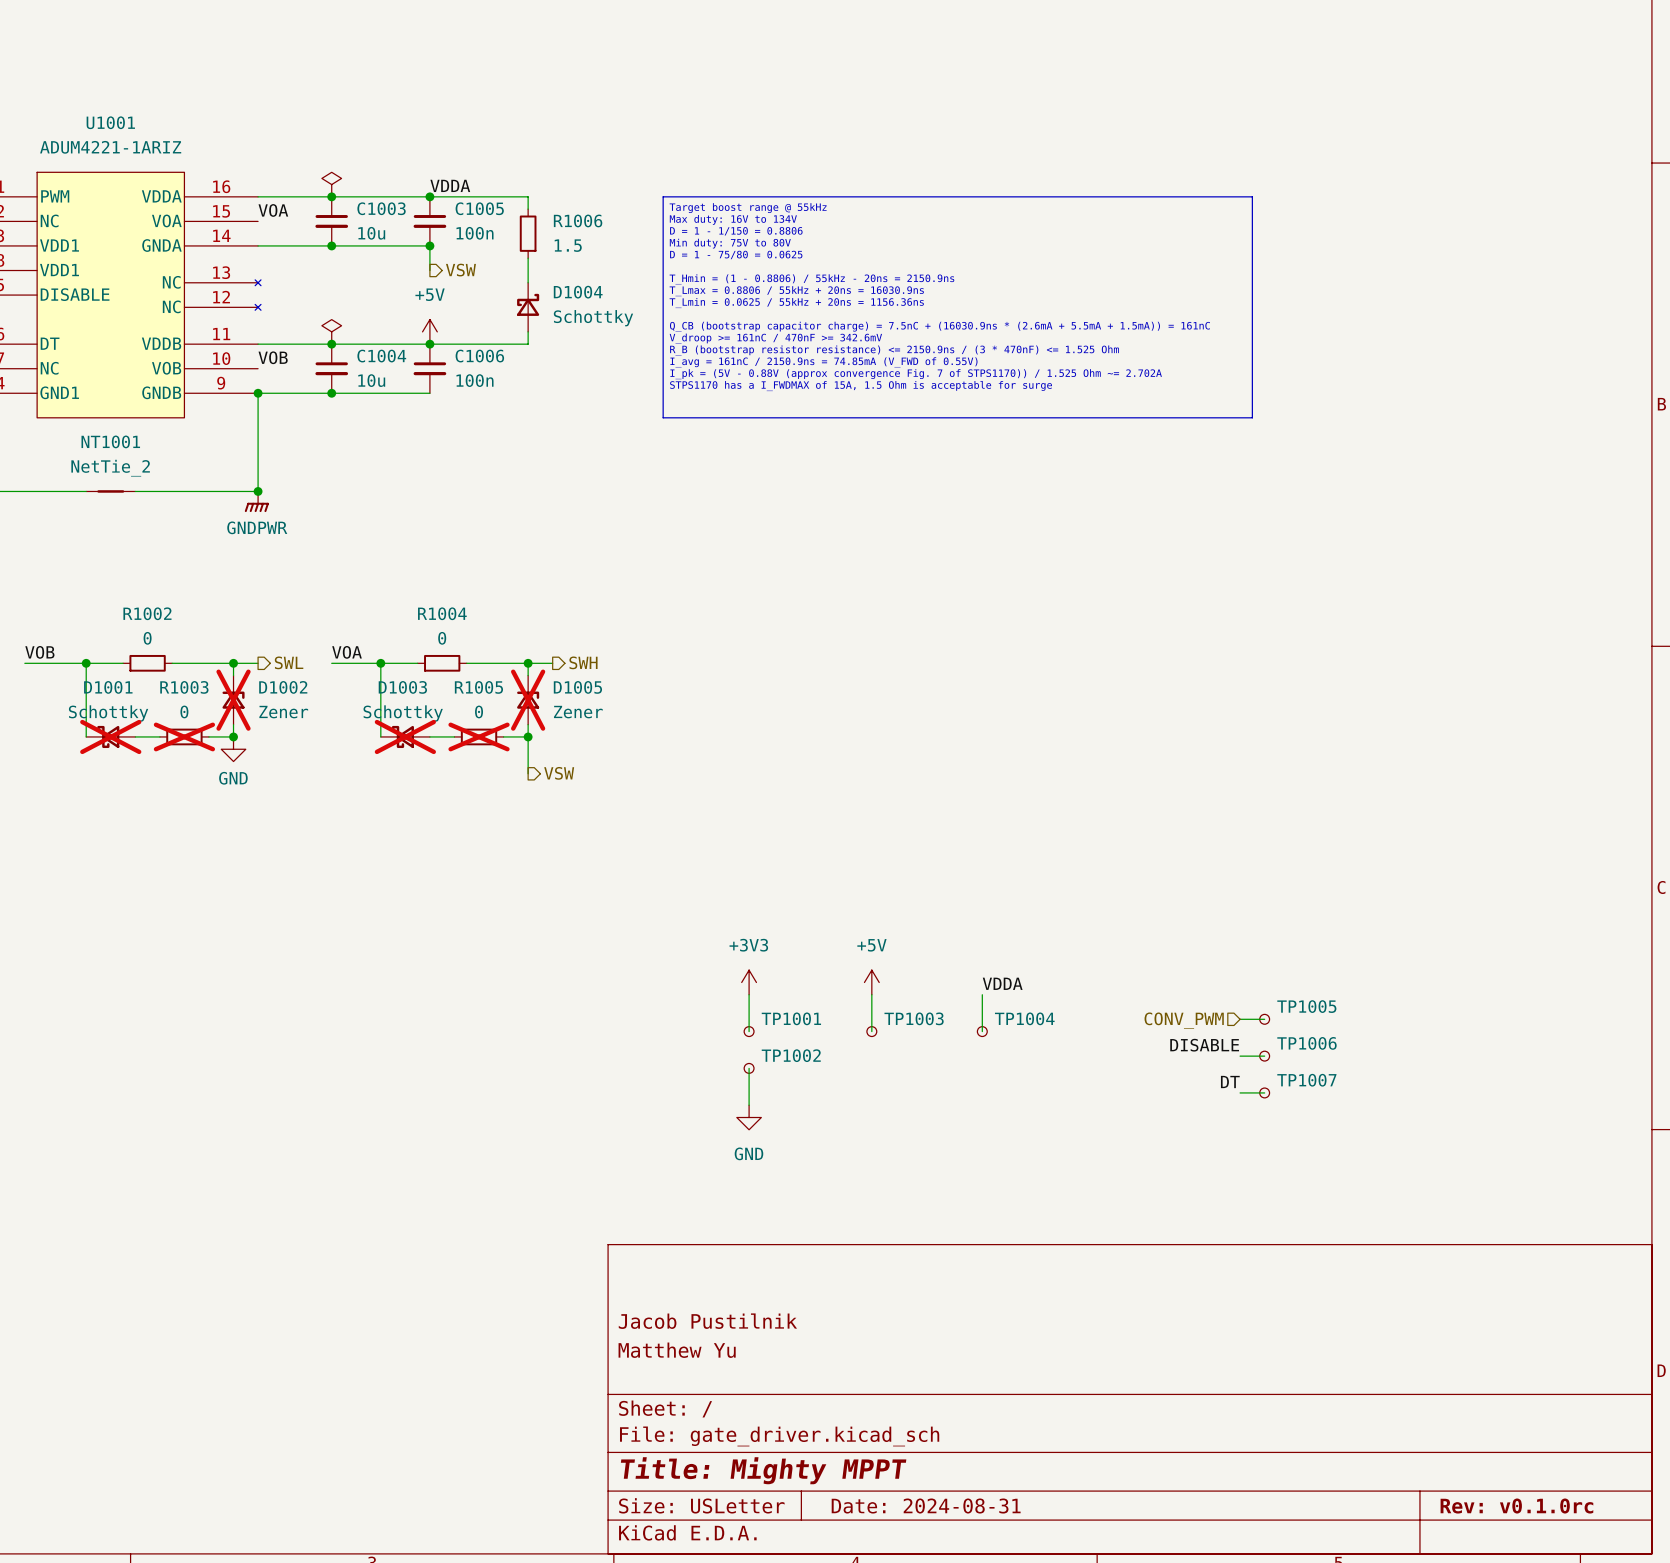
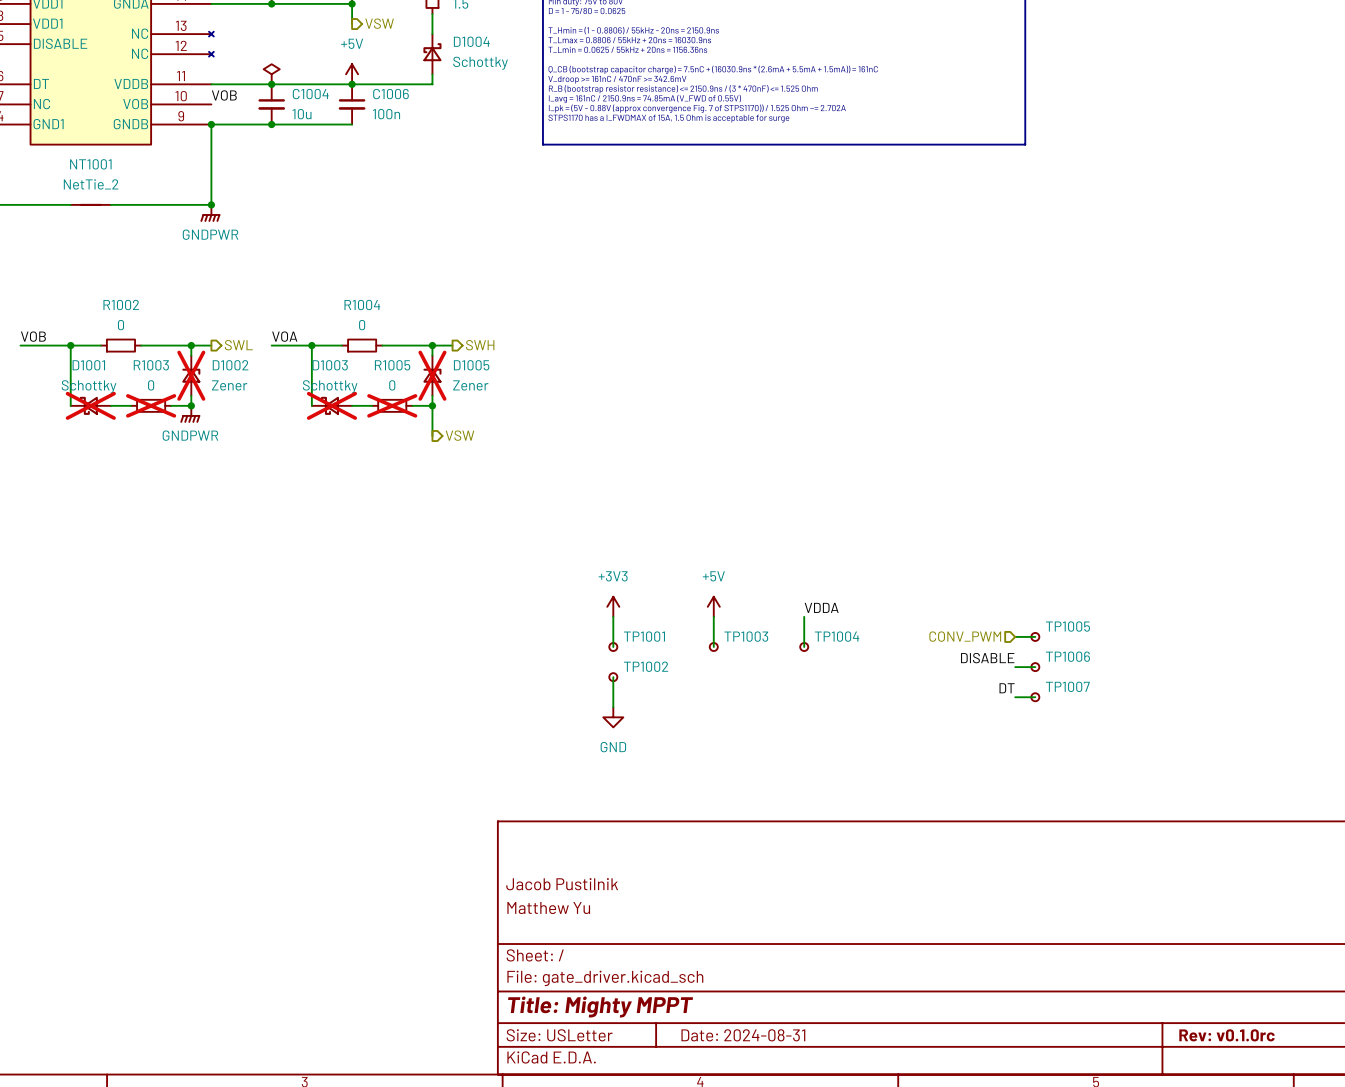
power symbol: GND (233, 749) -> GNDPWR (190, 414)

